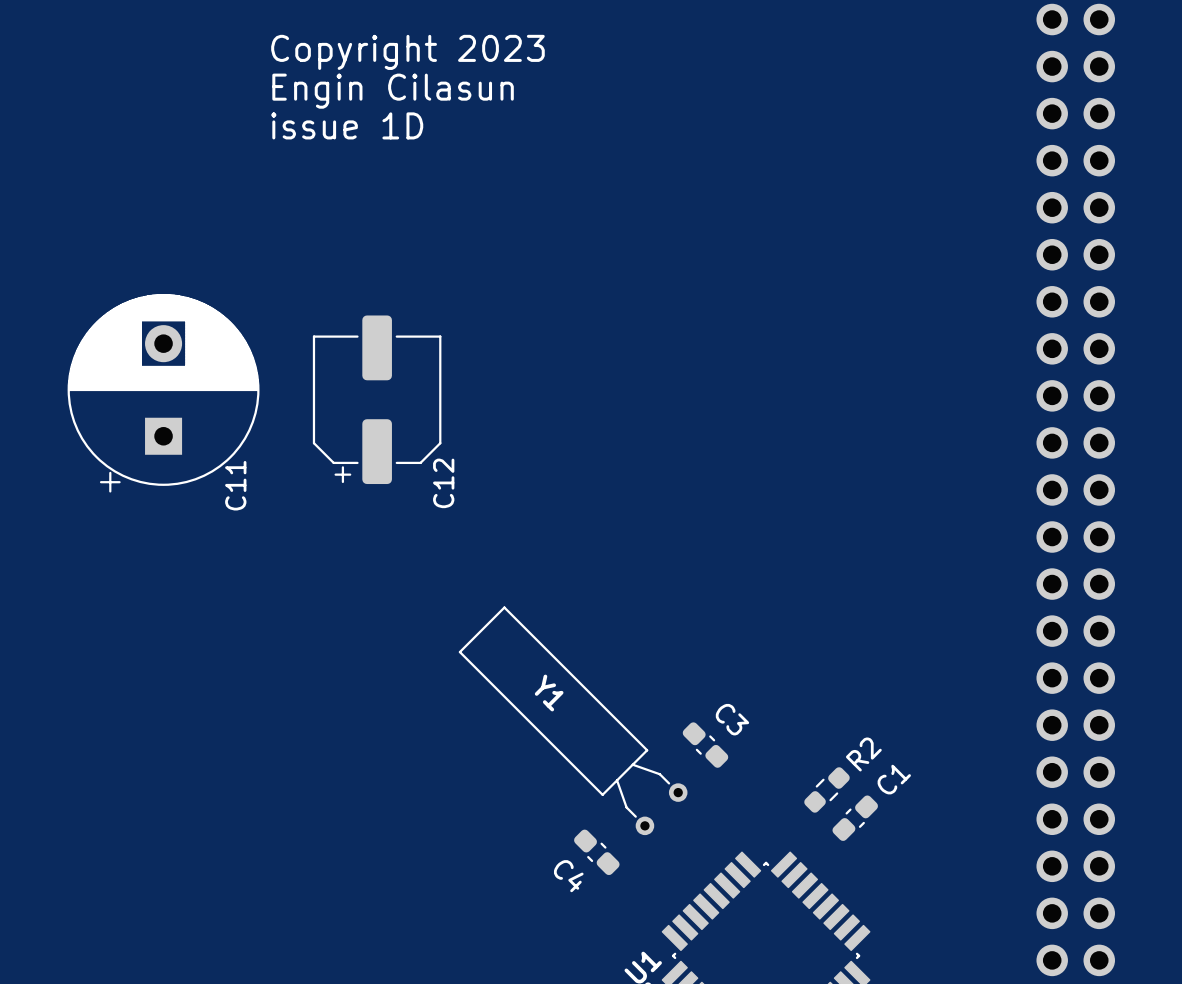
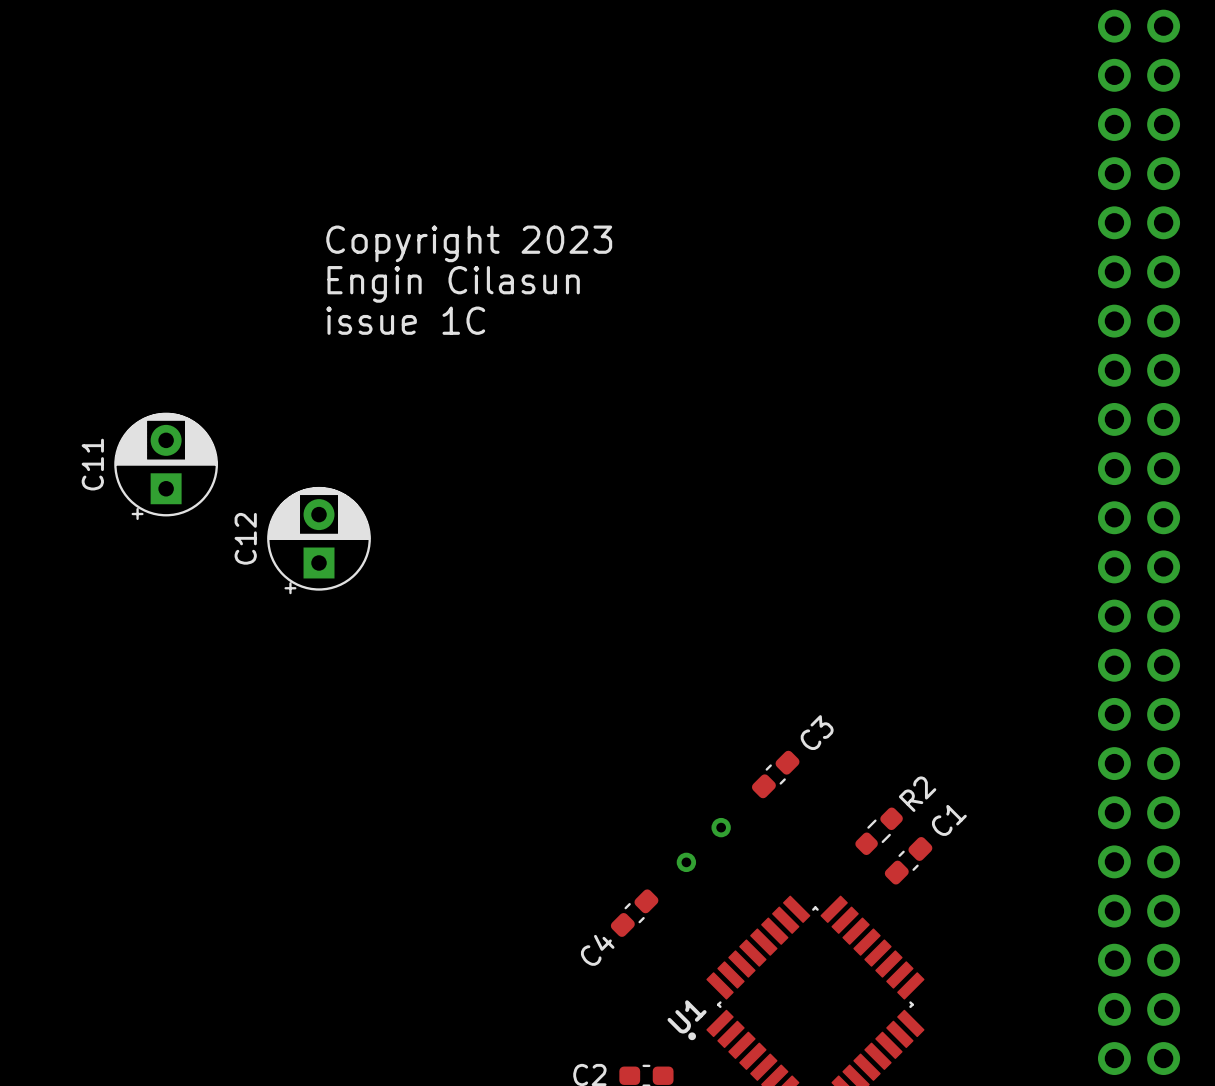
text position: Copyright 2023 (407, 52) -> Copyright 2023 (469, 243)
text position: Engin Cilasun (393, 91) -> Engin Cilasun (453, 284)
text: issue 1D (347, 125) -> none
C11 footprint: [67, 294, 260, 493] -> [114, 412, 218, 521]
text: none -> issue 1C (405, 320)
C12 footprint: [312, 315, 442, 485] -> [267, 486, 371, 595]
C12 name position: C12 (443, 483) -> C12 (245, 538)
C11 name position: C11 (235, 485) -> C11 (92, 464)
Y1 side: top (573, 720) -> bottom (703, 844)
C3 rotation: 0° (705, 745) -> 90° clockwise (775, 774)
C4 rotation: 0° (596, 852) -> 90° clockwise (634, 913)

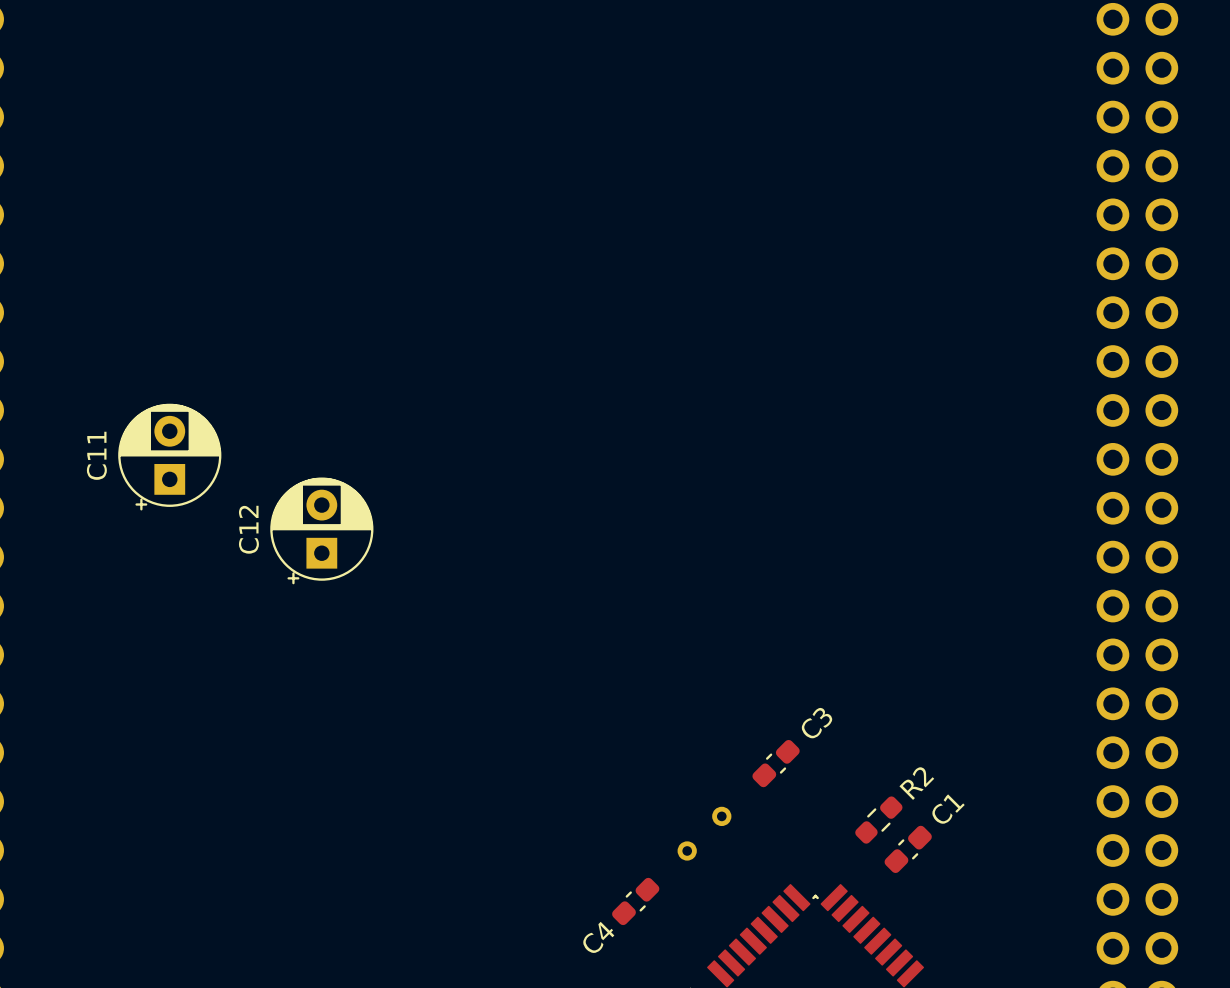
text: Copyright 2023 (469, 243) -> none
text: Engin Cilasun (453, 284) -> none
text: issue 1C (405, 320) -> none

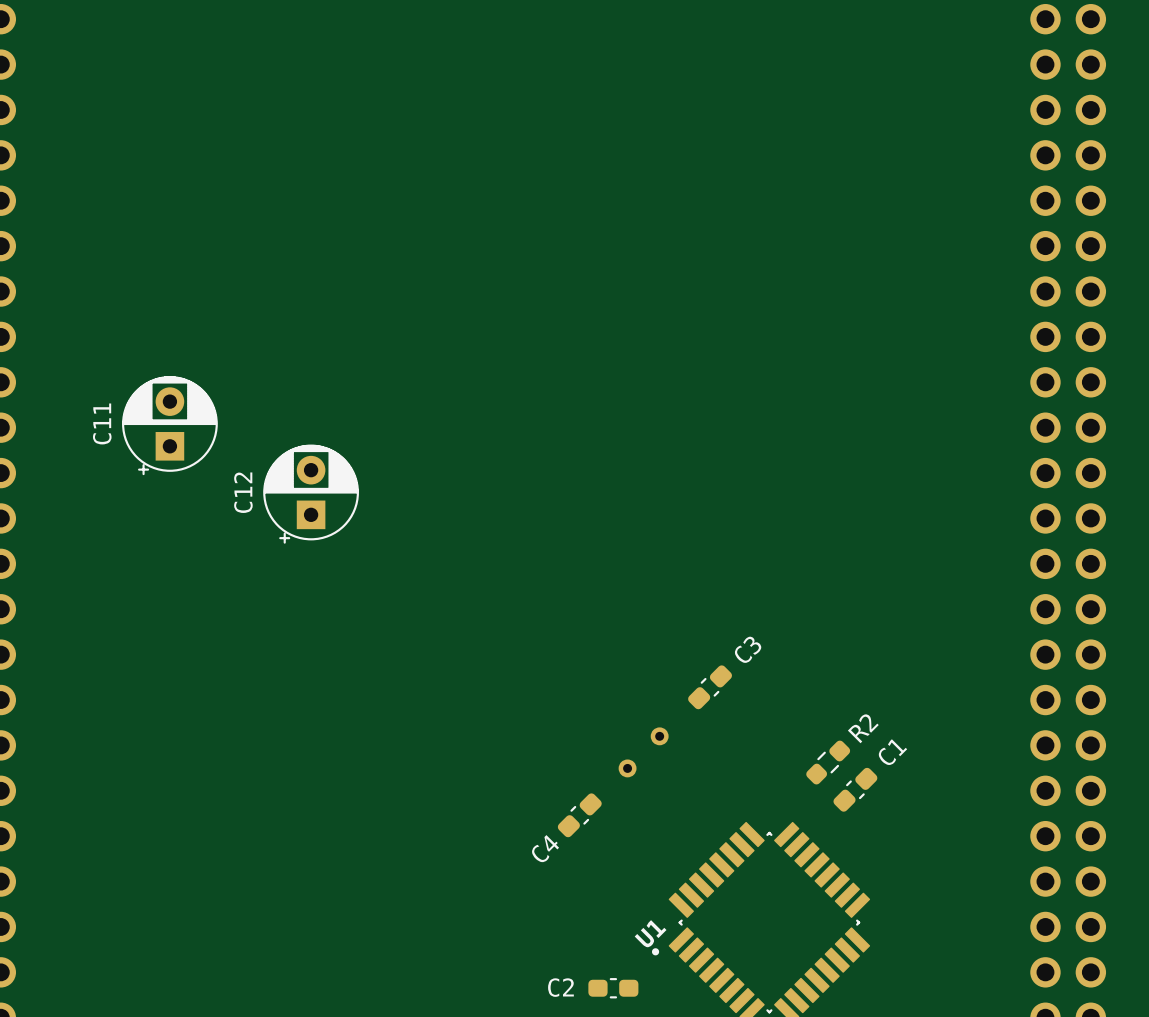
C3 position: (776, 763) -> (710, 687)
part position: (704, 833) -> (643, 752)
C4 position: (635, 901) -> (579, 815)

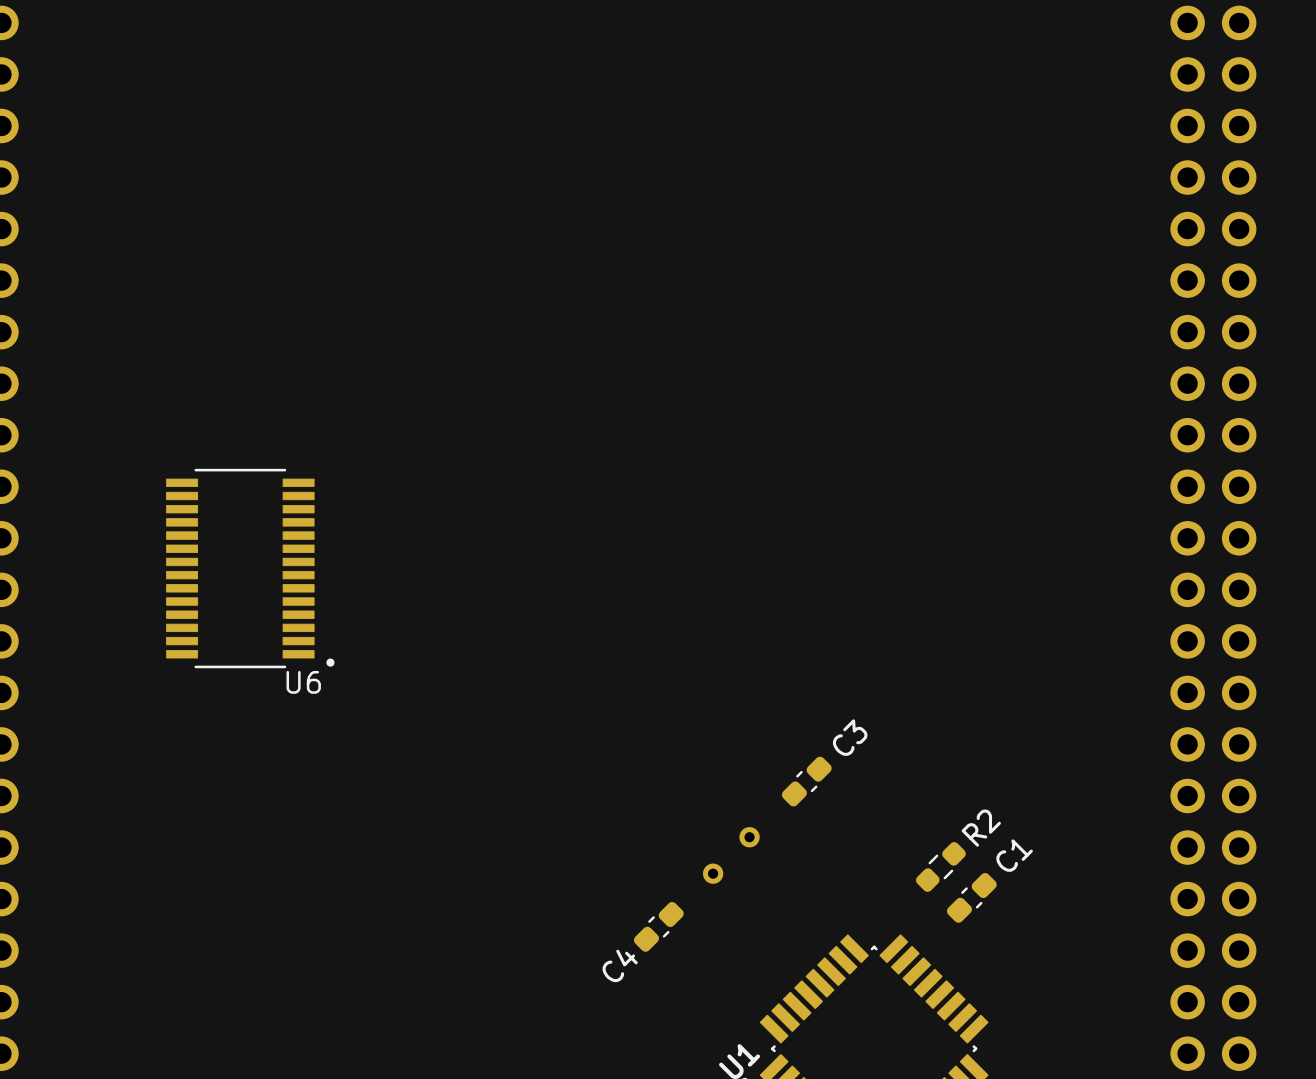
C11: (169, 425) -> none
C12: (311, 494) -> none
U6: none -> (250, 568)

